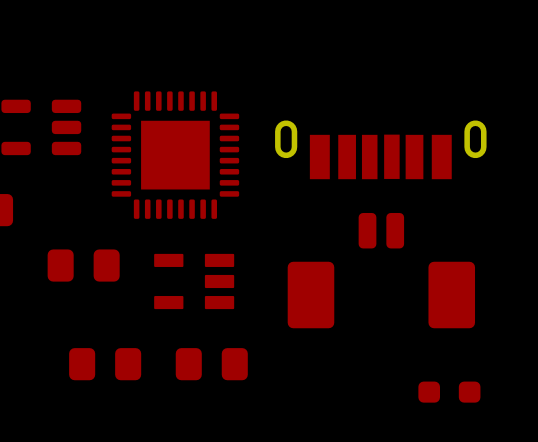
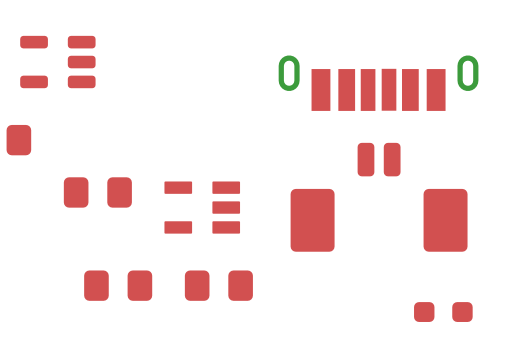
part: (175, 155) -> none

